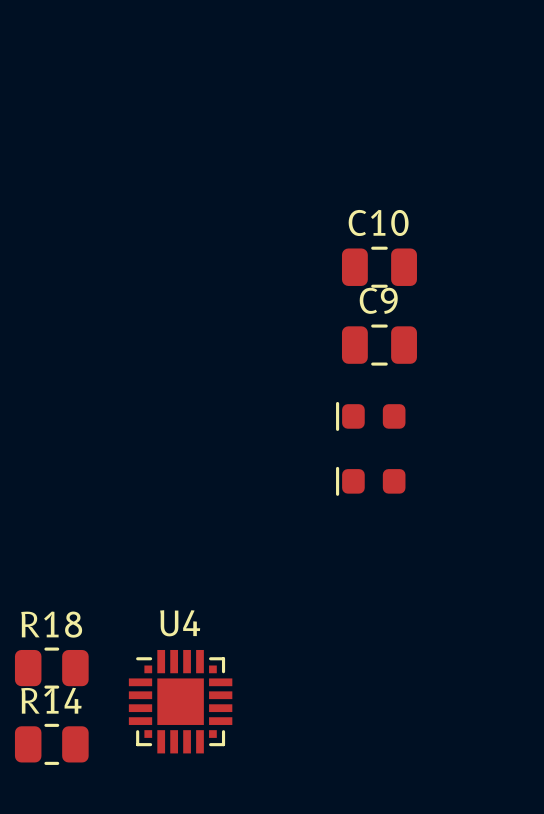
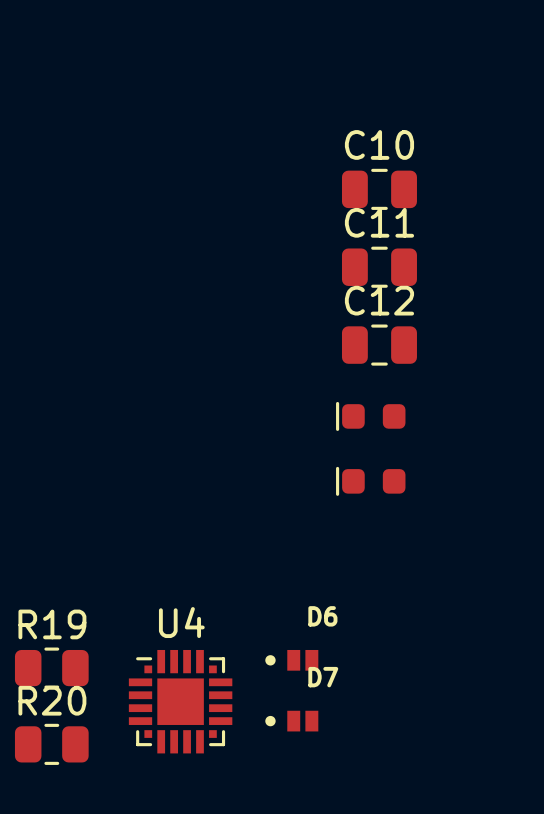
C10: none -> (379, 189)
C10 name: C10 (378, 222) -> C11 (379, 222)
C9 name: C9 (378, 300) -> C12 (379, 300)
R18 name: R18 (51, 624) -> R19 (52, 624)
D6: none -> (291, 660)
R14 name: R14 (51, 700) -> R20 (52, 700)
D7: none -> (291, 721)

